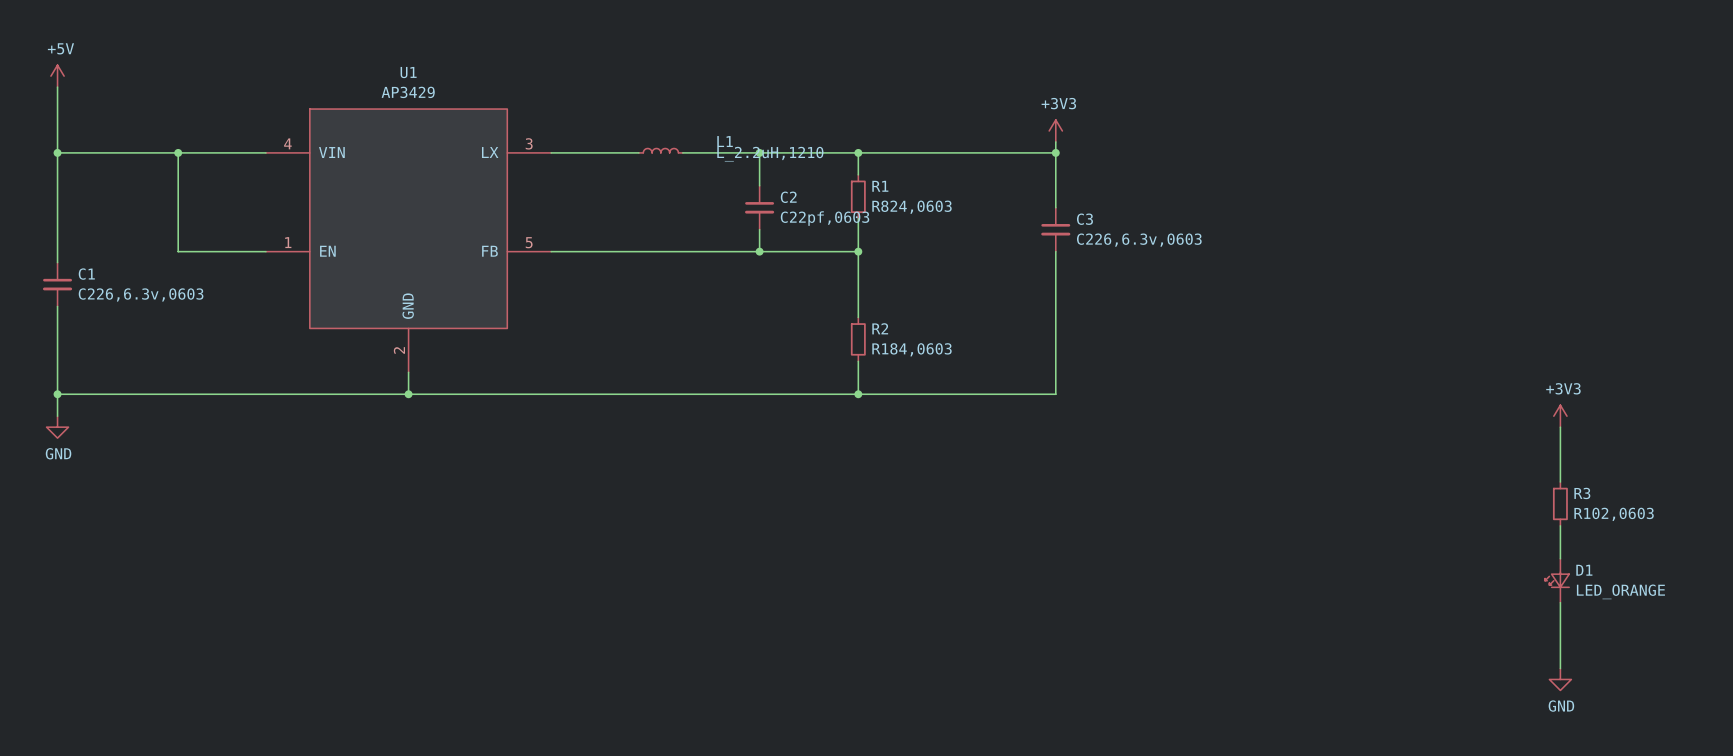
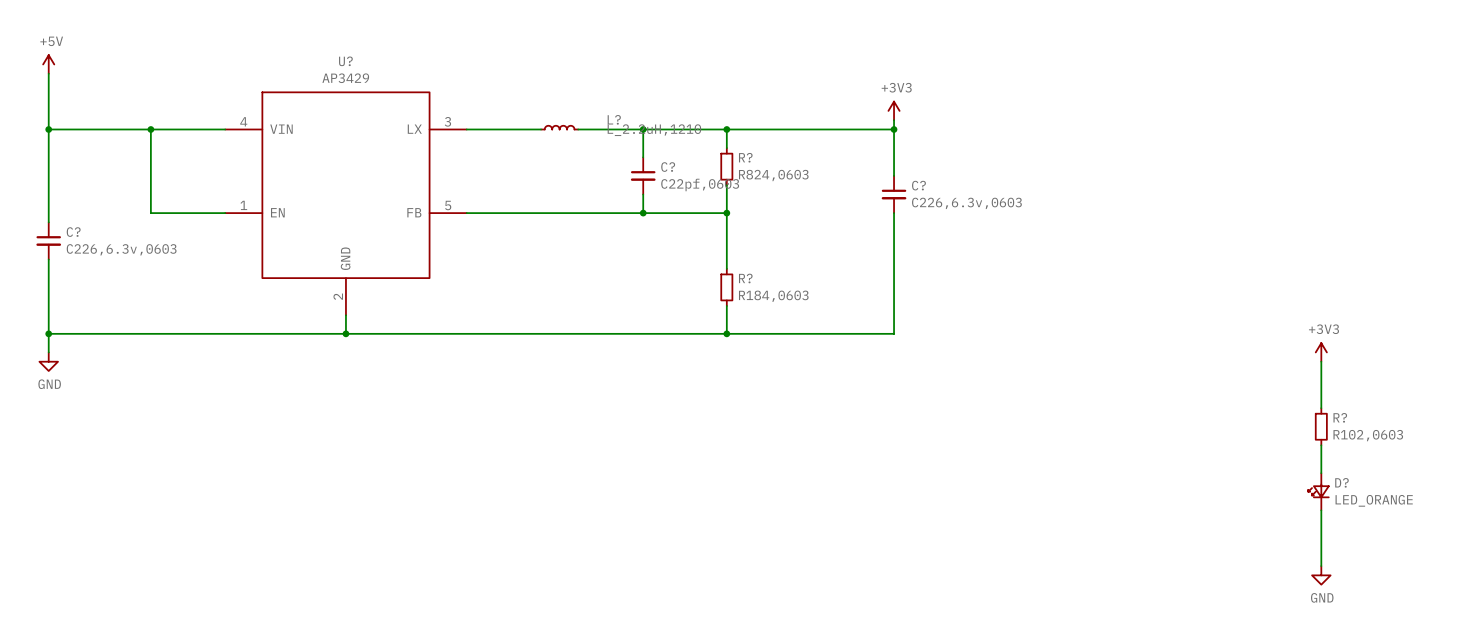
U1 name: U1 (408, 72) -> U? (345, 61)
L1 name: L1 (725, 141) -> L? (614, 119)
R1 name: R1 (880, 186) -> R? (745, 157)
C2 name: C2 (788, 197) -> C? (668, 167)
C3 name: C3 (1084, 219) -> C? (918, 185)
C1 name: C1 (86, 274) -> C? (73, 232)
R2 name: R2 (880, 328) -> R? (745, 278)
R3 name: R3 (1582, 493) -> R? (1340, 417)
D1 name: D1 (1584, 570) -> D? (1341, 482)

